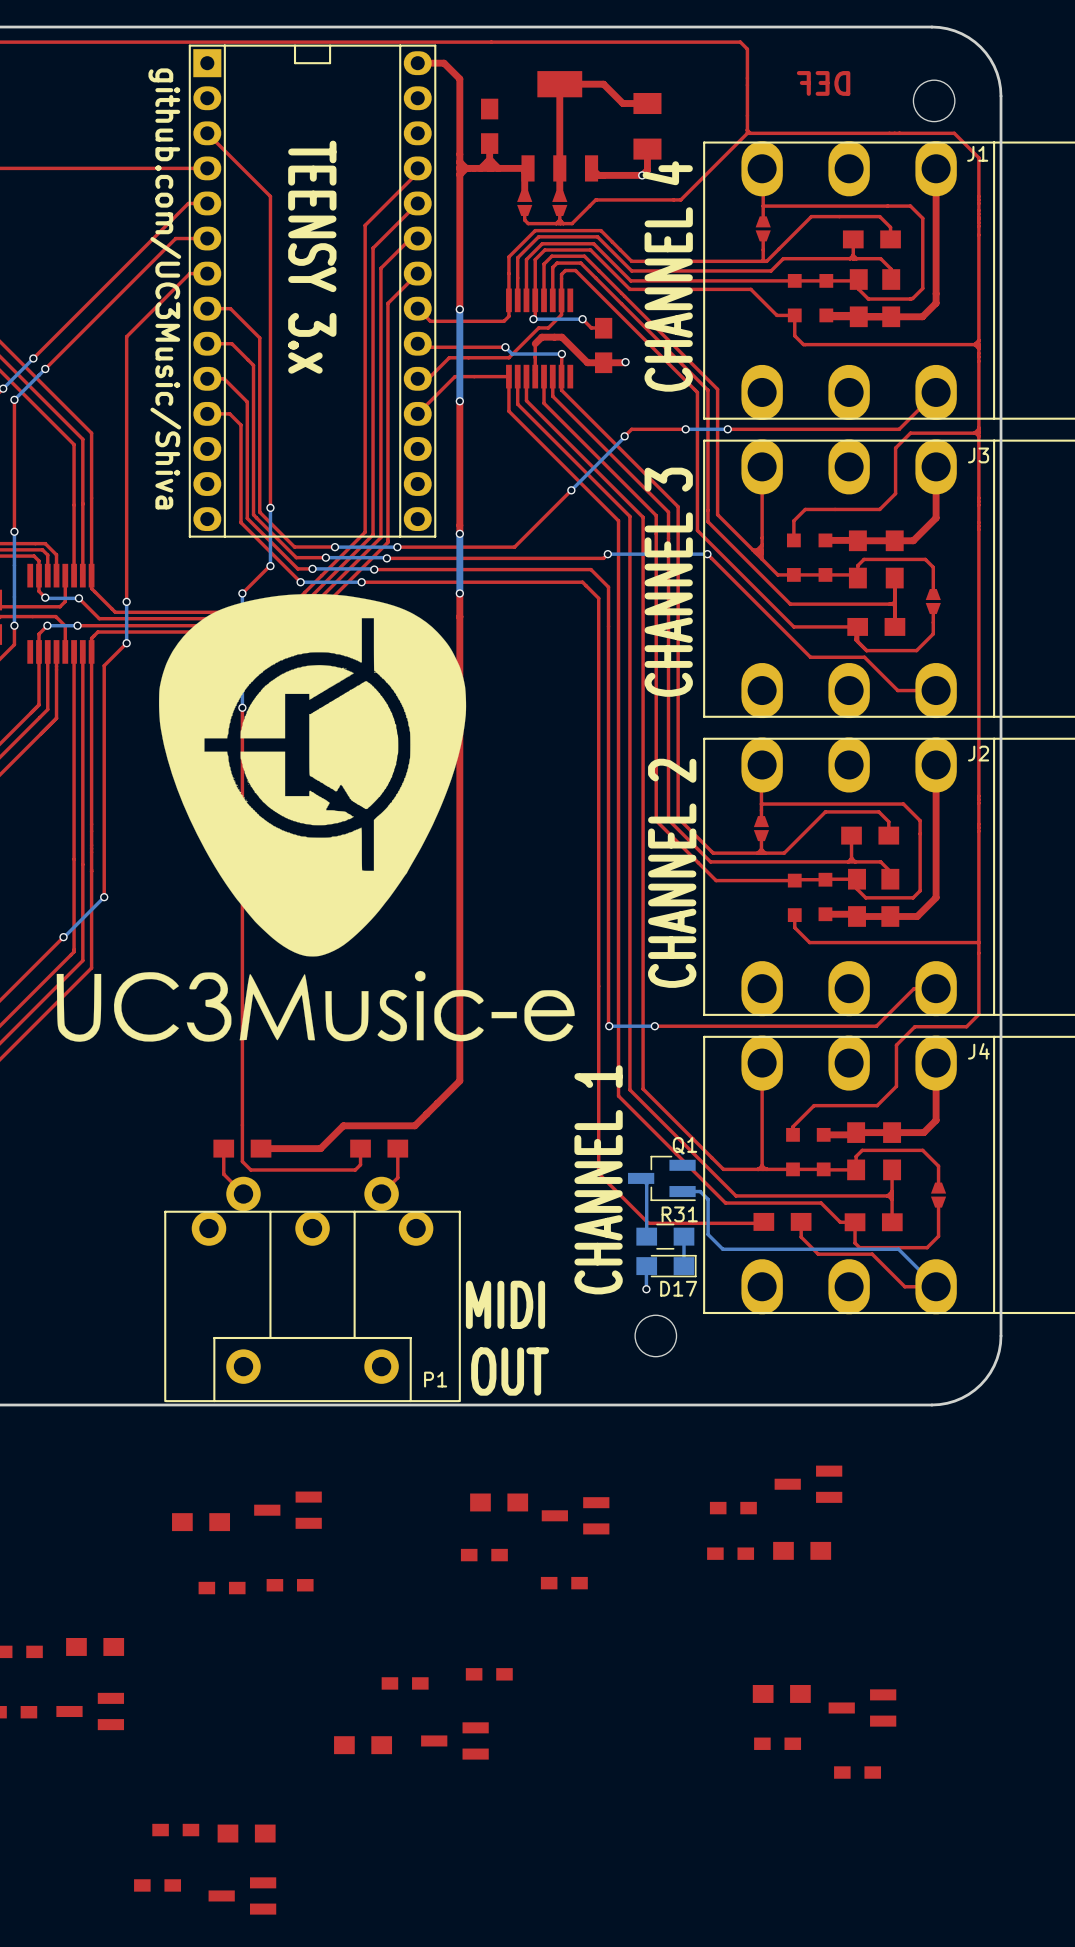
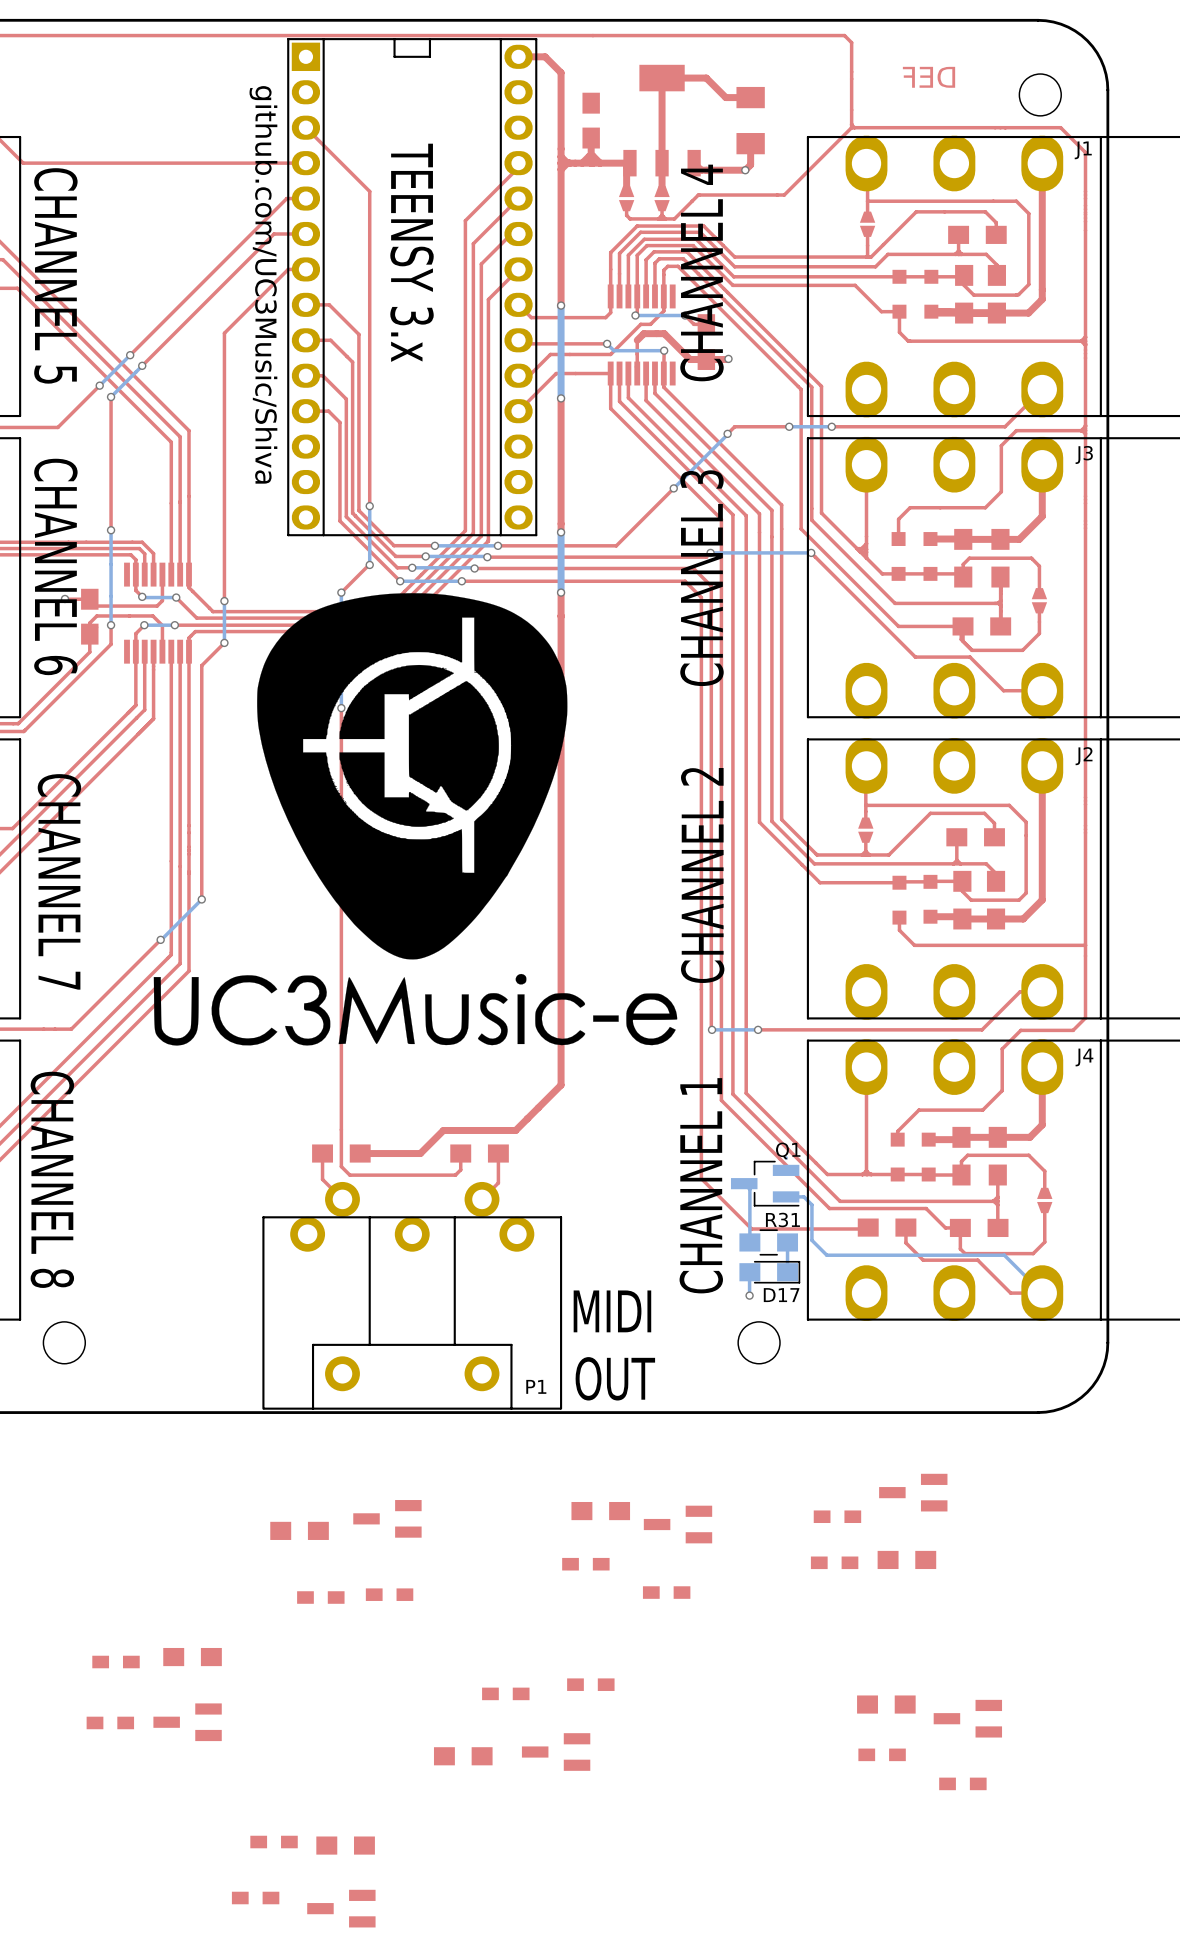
text position: CHANNEL 4 (667, 276) -> CHANNEL 4 (701, 272)
text position: CHANNEL 3 (668, 582) -> CHANNEL 3 (701, 578)
text position: CHANNEL 2 (672, 873) -> CHANNEL 2 (702, 875)

